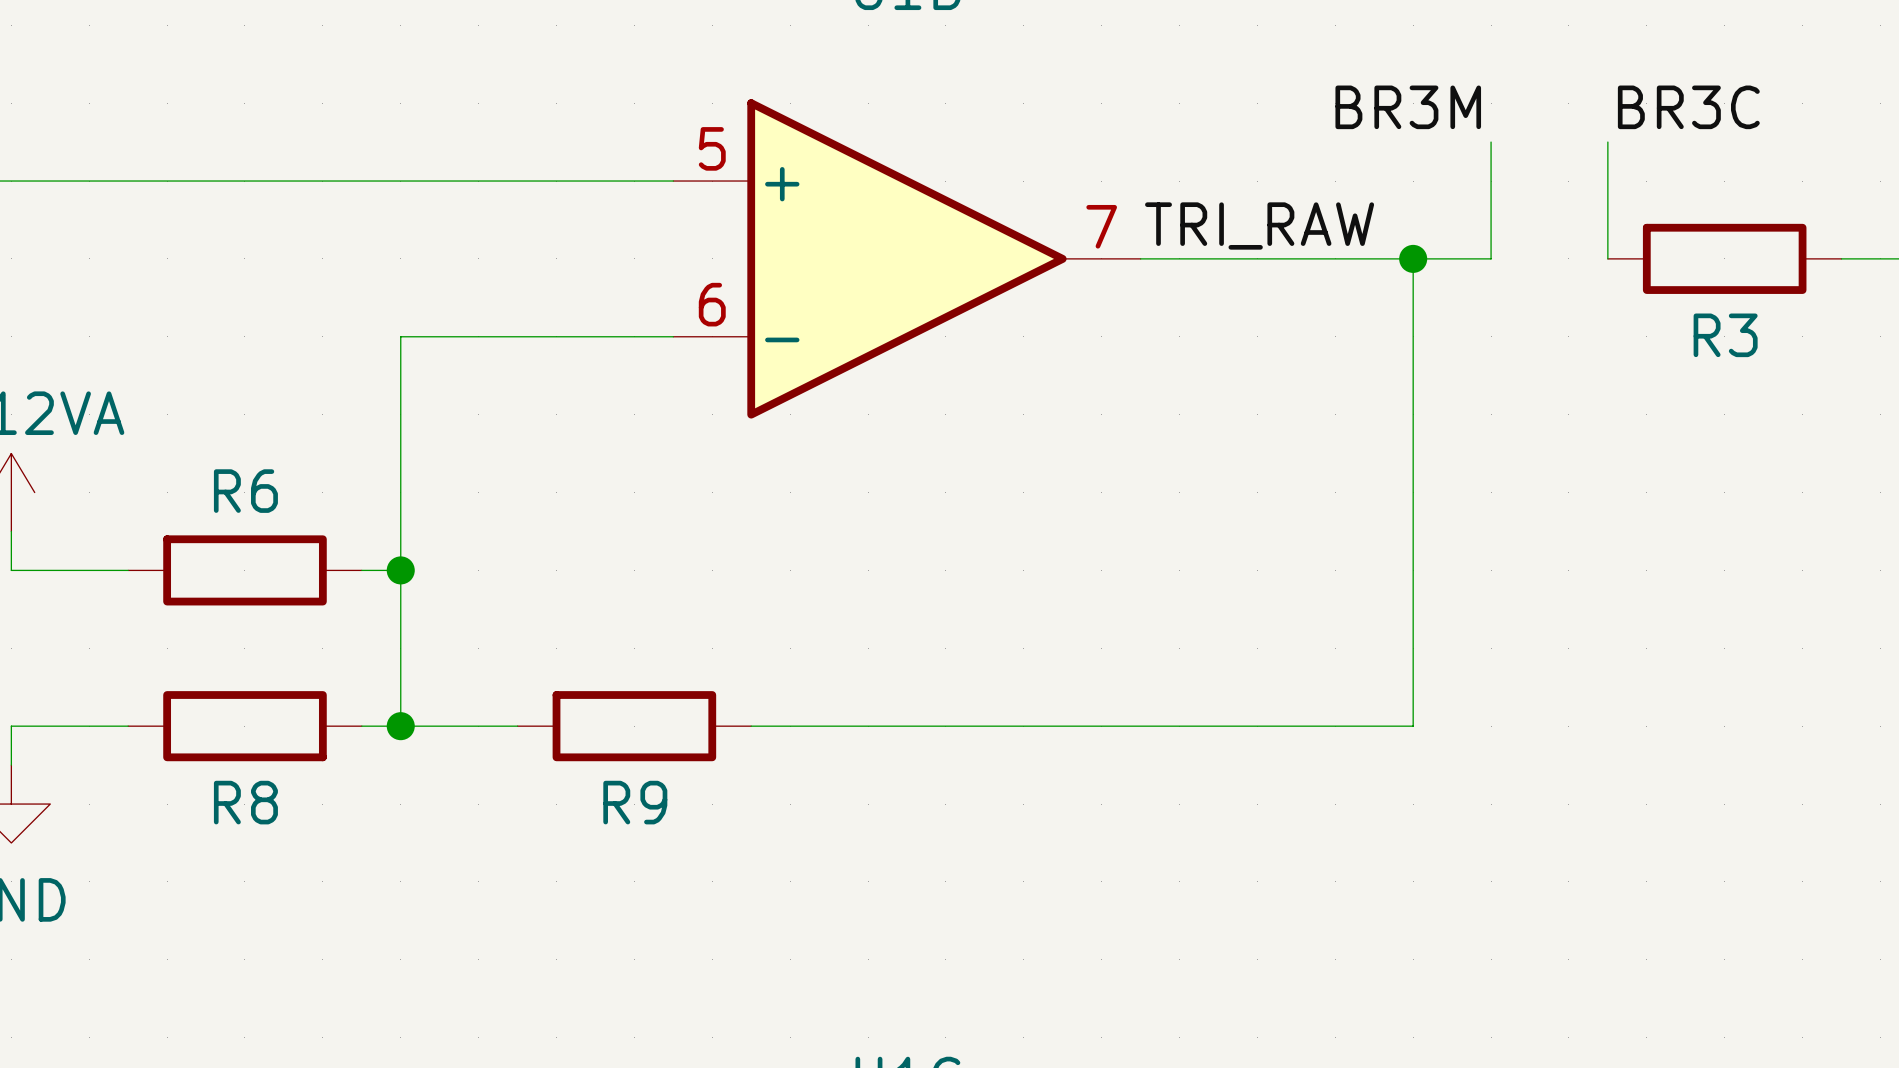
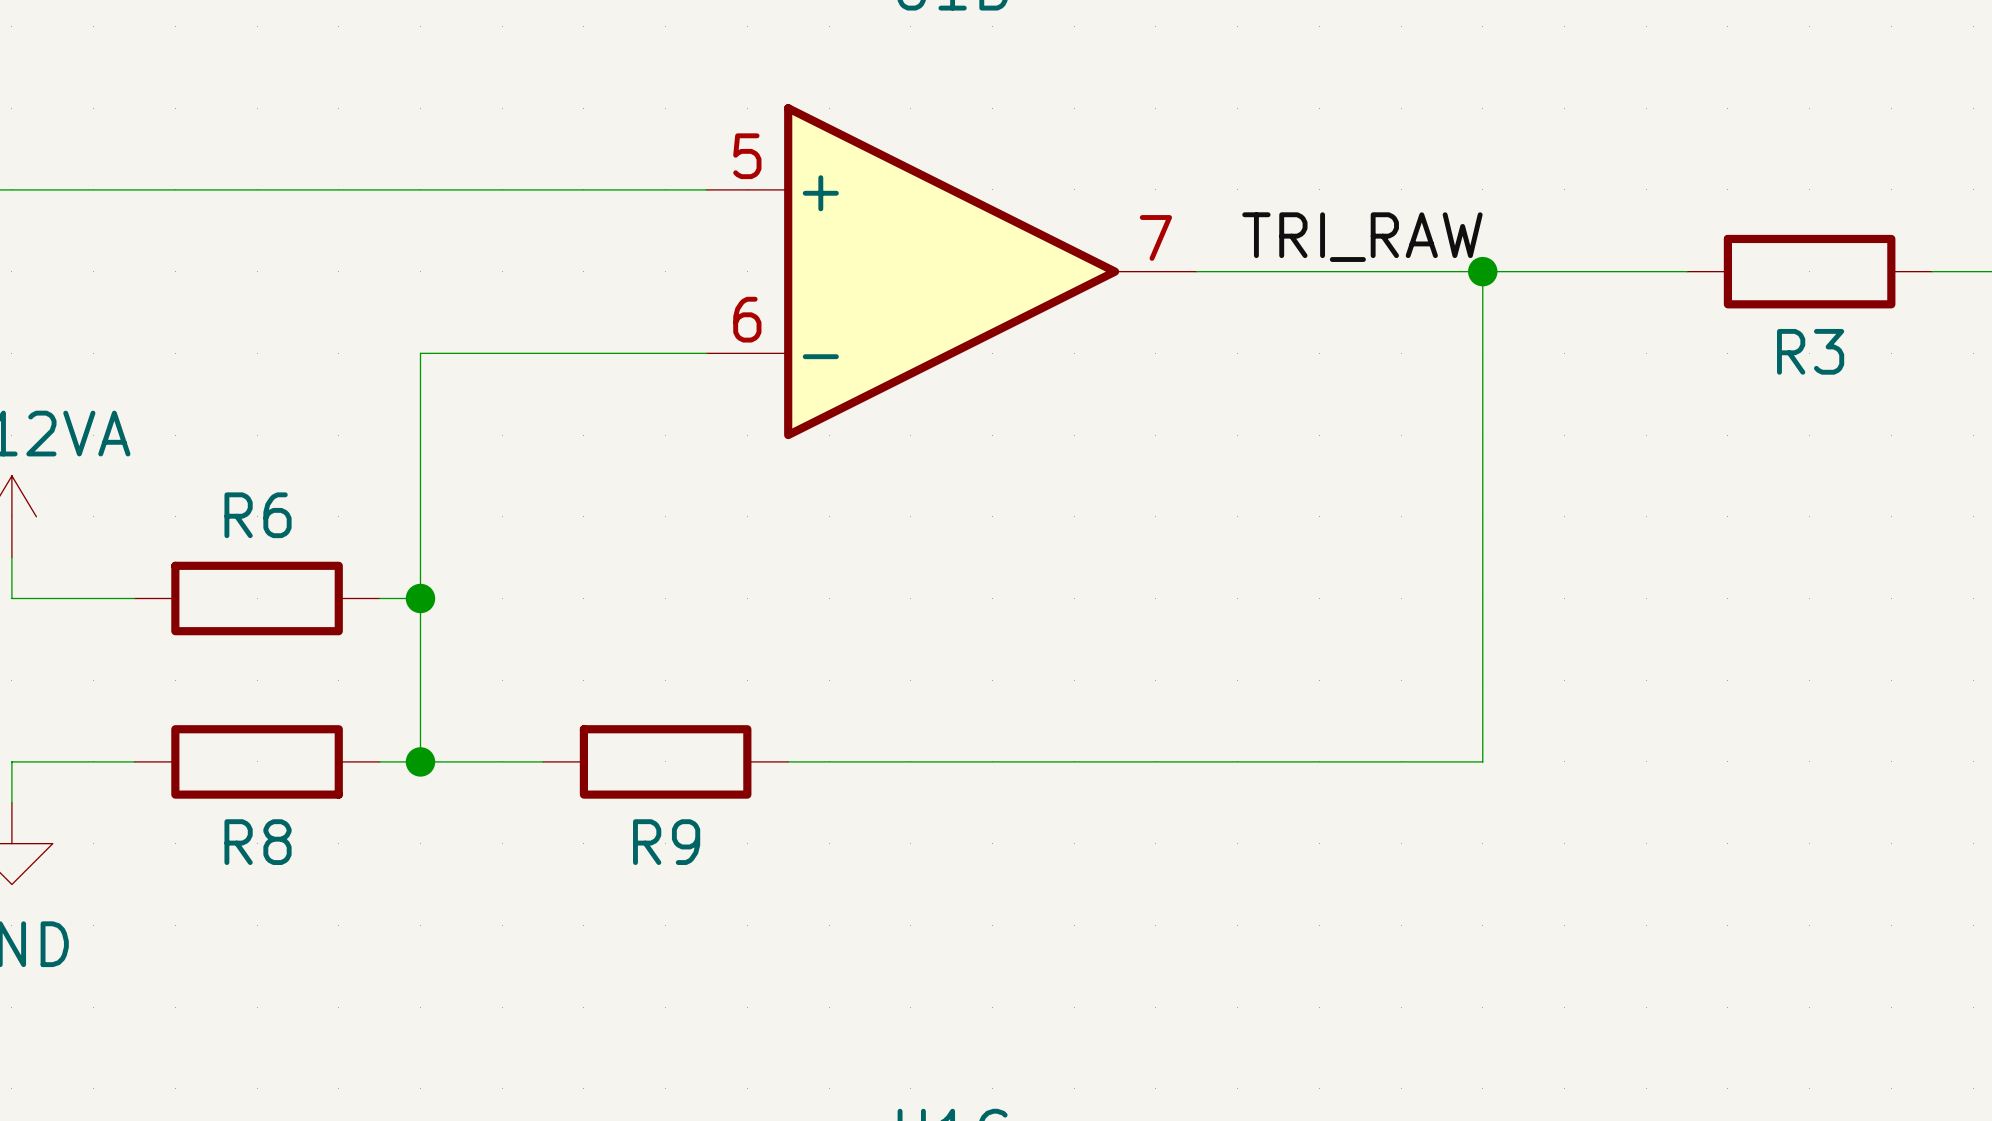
label: BR3M (1408, 107) -> none
label: BR3C (1688, 107) -> none
wire: (1491, 142) (1491, 258) -> (1687, 271) (1564, 271)
wire: (1607, 142) (1607, 258) -> none
label position: TRI_RAW (1259, 226) -> TRI_RAW (1362, 237)

